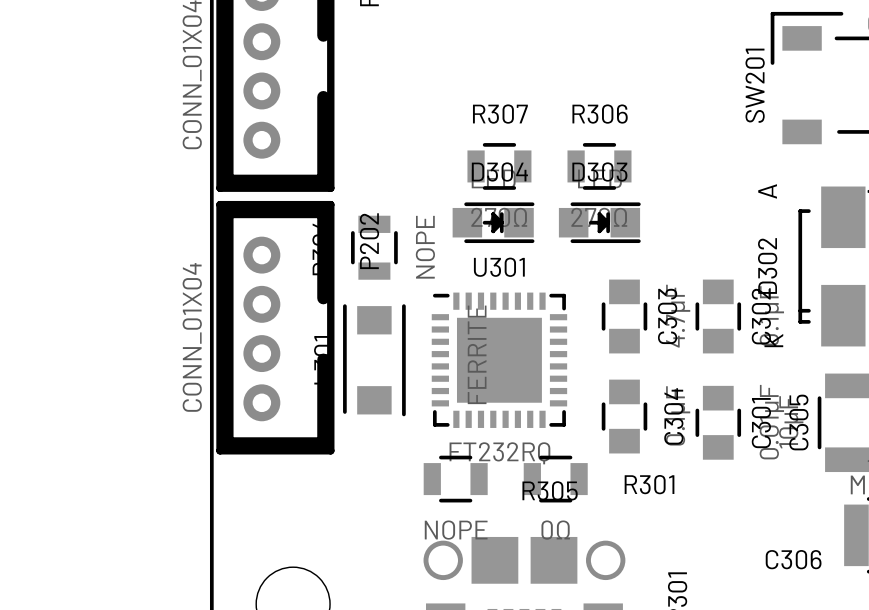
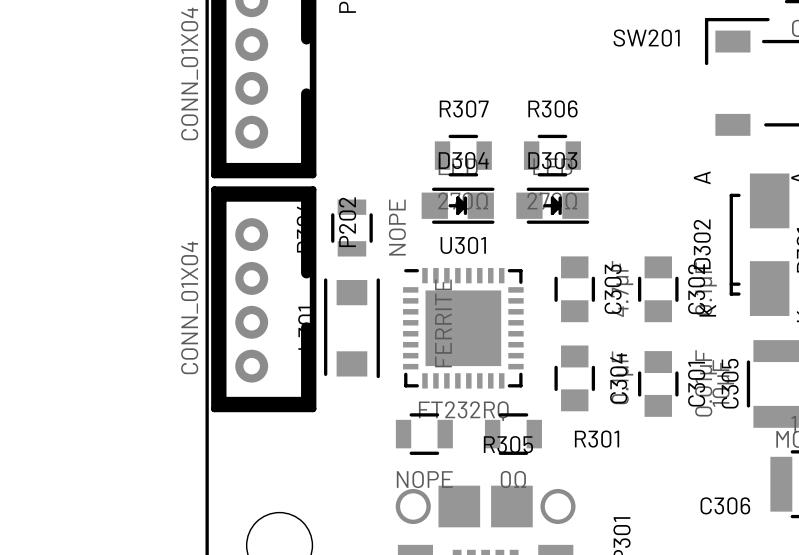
SW201 name rotation: 0° (755, 85) -> 90° clockwise (646, 38)

